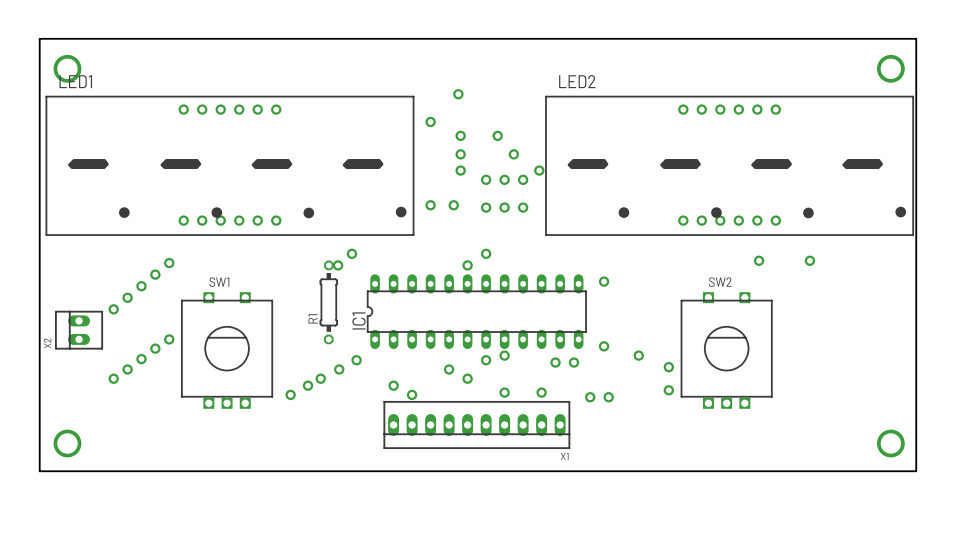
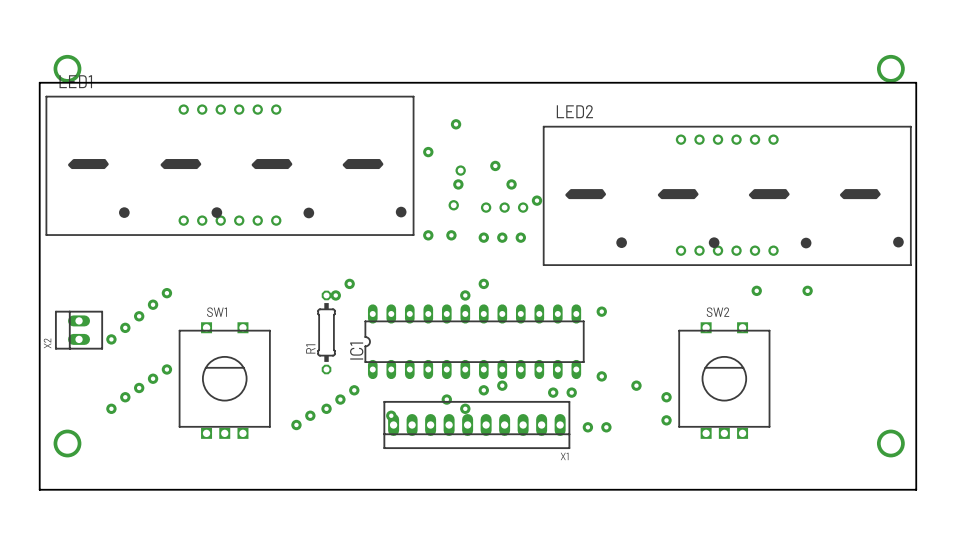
board edge: (39, 82) (39, 38) (916, 38) (916, 82) -> (39, 82) (916, 82)
via: (458, 94) -> none
via: (430, 122) -> none
via: none -> (456, 124)
via: (460, 135) -> none
via: (497, 135) -> none
via: none -> (428, 152)
via: (460, 154) -> none
via: (513, 154) -> none
via: none -> (495, 165)
LED2 position: (729, 165) -> (727, 195)
via: (539, 170) -> none
via: (486, 179) -> none
via: (504, 179) -> none
via: (523, 179) -> none
via: none -> (458, 184)
via: none -> (511, 184)
via: none -> (537, 200)
via: (430, 205) -> none
via: none -> (428, 235)
via: none -> (451, 235)
via: none -> (483, 237)
via: none -> (502, 237)
via: none -> (520, 237)
via: (351, 253) -> none
via: (486, 253) -> none
via: (759, 260) -> none
via: (809, 260) -> none
via: (169, 263) -> none
via: (338, 265) -> none
via: (467, 265) -> none
via: (155, 274) -> none
via: (604, 281) -> none
via: none -> (349, 283)
via: none -> (483, 283)
via: (141, 286) -> none
via: none -> (756, 290)
via: none -> (807, 290)
via: none -> (166, 293)
via: none -> (335, 295)
via: none -> (465, 295)
via: (127, 297) -> none
R1 position: (328, 302) -> (326, 332)
via: none -> (153, 304)
via: (113, 309) -> none
IC1 position: (476, 311) -> (474, 341)
via: none -> (601, 311)
via: none -> (139, 316)
via: none -> (125, 327)
via: none -> (111, 339)
via: (169, 339) -> none
via: (604, 346) -> none
via: (155, 348) -> none
SW1 position: (227, 350) -> (224, 380)
SW2 position: (726, 350) -> (724, 380)
via: (504, 355) -> none
via: (638, 355) -> none
via: (141, 359) -> none
via: (356, 360) -> none
via: (486, 360) -> none
via: (555, 362) -> none
via: (574, 362) -> none
via: (668, 367) -> none
via: (127, 369) -> none
via: none -> (166, 369)
via: (339, 369) -> none
via: (449, 369) -> none
via: none -> (601, 376)
via: (113, 378) -> none
via: none -> (153, 378)
via: (320, 378) -> none
via: (467, 378) -> none
via: (308, 385) -> none
via: (393, 385) -> none
via: none -> (502, 385)
via: none -> (636, 385)
via: none -> (139, 387)
via: none -> (354, 390)
via: none -> (483, 390)
via: (668, 390) -> none
via: (504, 392) -> none
via: (541, 392) -> none
via: none -> (553, 392)
via: none -> (571, 392)
via: (290, 394) -> none
via: (412, 394) -> none
via: none -> (125, 397)
via: (590, 397) -> none
via: (608, 397) -> none
via: none -> (666, 397)
via: none -> (340, 399)
via: none -> (446, 399)
via: none -> (111, 408)
via: none -> (326, 408)
via: none -> (465, 408)
via: none -> (310, 415)
via: none -> (391, 415)
via: none -> (666, 420)
via: none -> (296, 424)
via: none -> (587, 427)
via: none -> (606, 427)
board edge: (39, 471) (916, 471) -> (39, 471) (39, 489) (916, 489) (916, 471)

